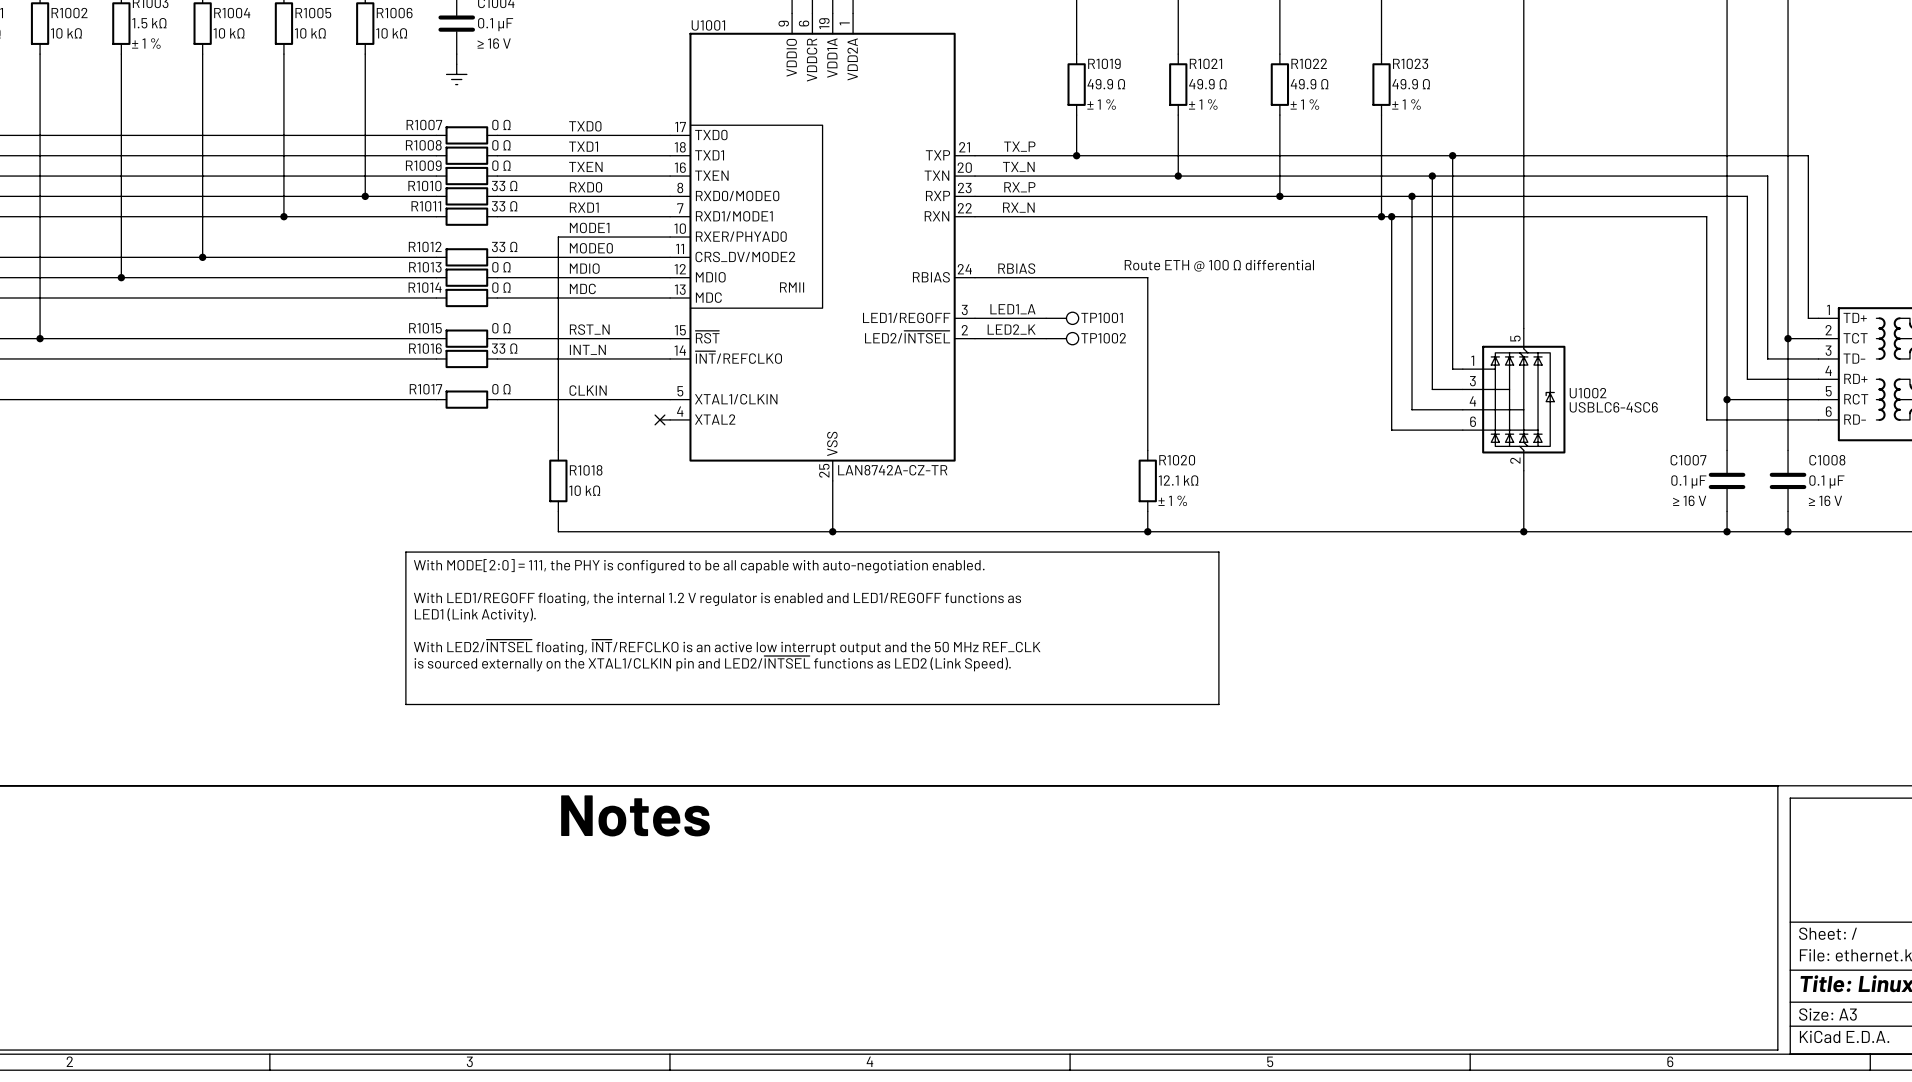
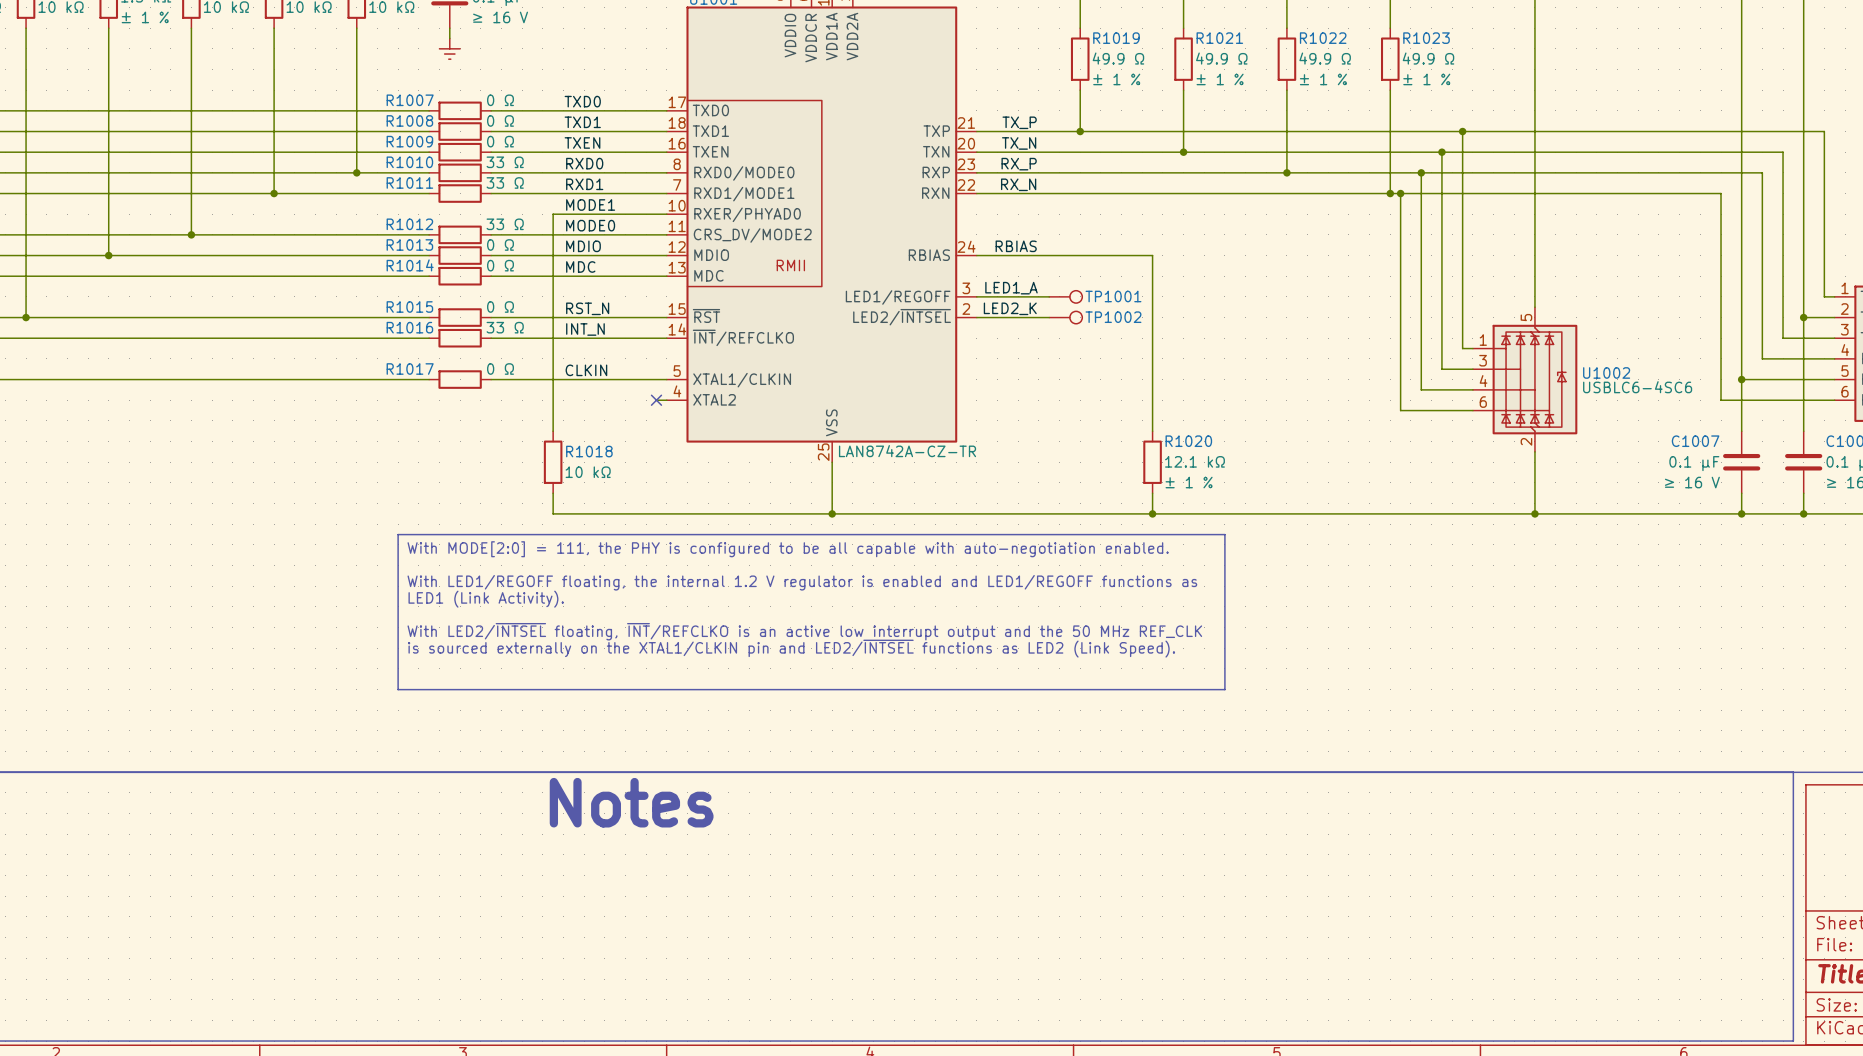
text: Route ETH @ 100 Ω differential (1219, 265) -> none

